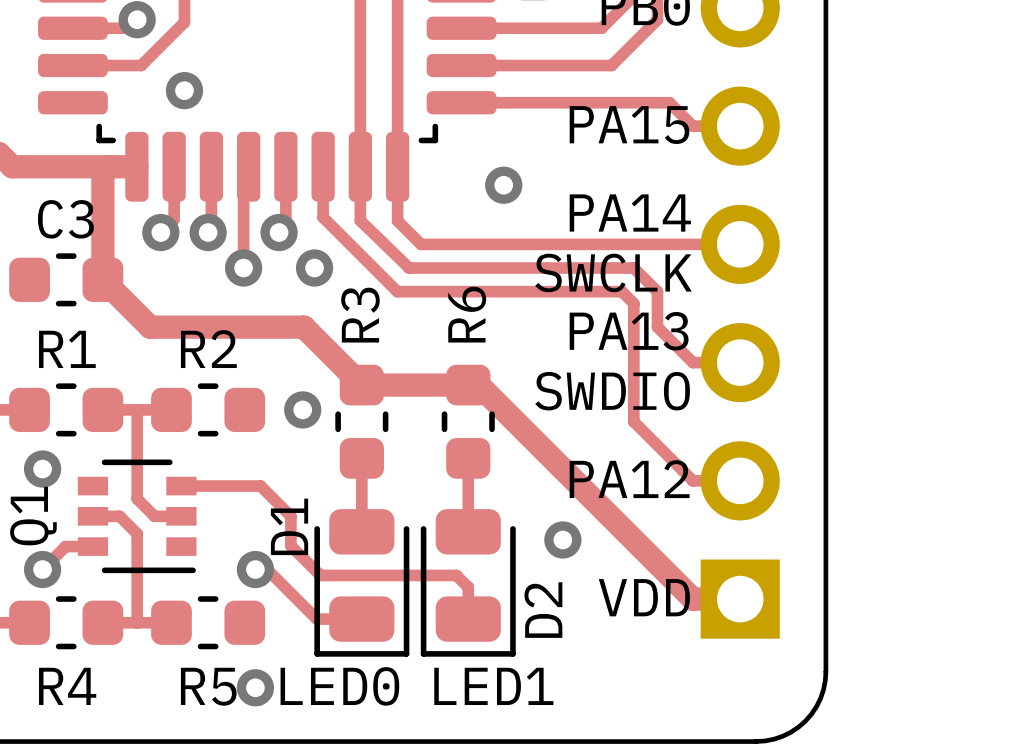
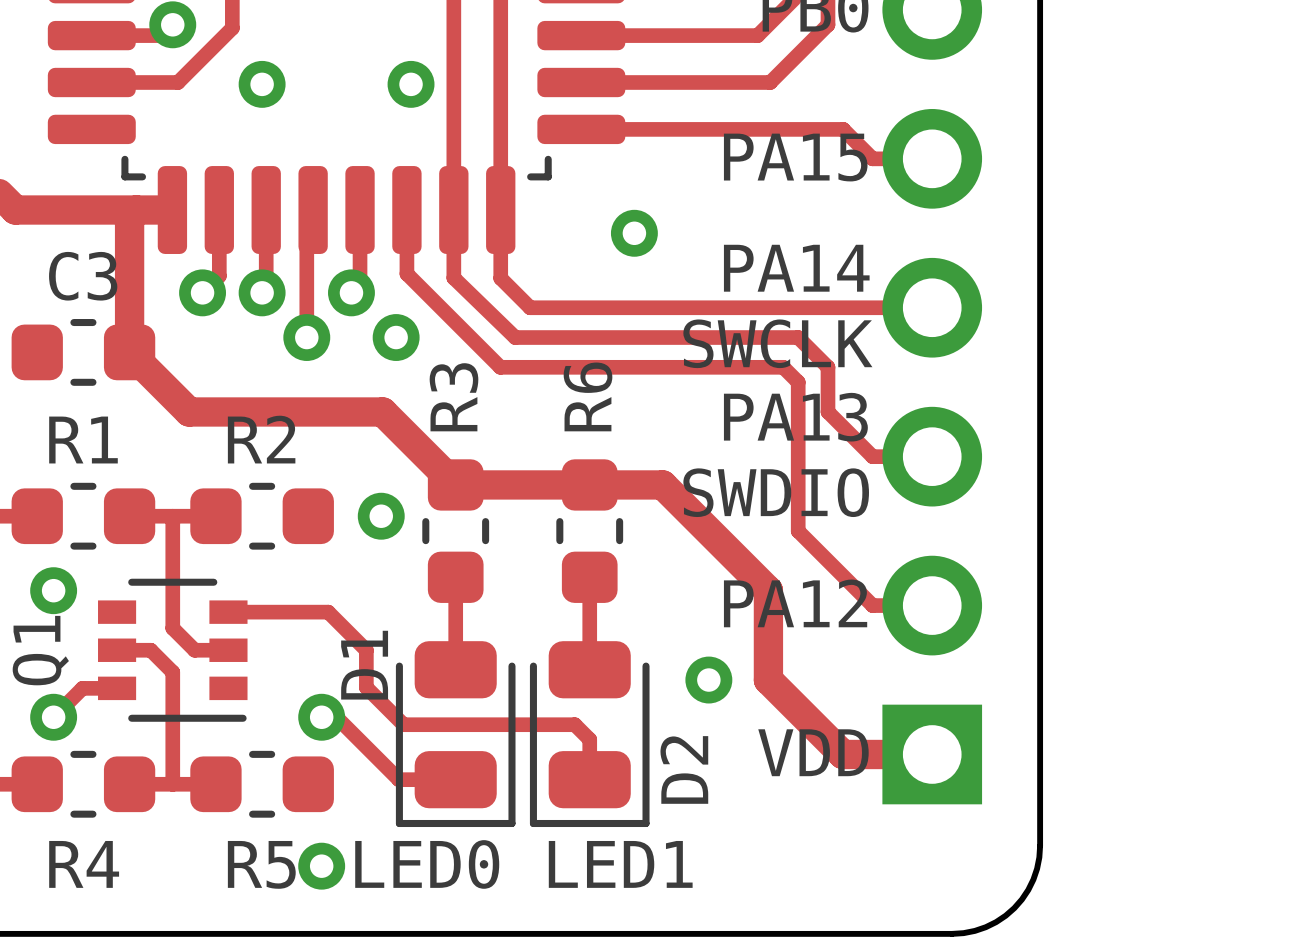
via: none -> (411, 84)
via position: (184, 90) -> (262, 84)
track: (478, 385) (692, 599) -> (603, 484) (662, 484) (768, 590) (768, 680) (842, 754) (872, 754)

